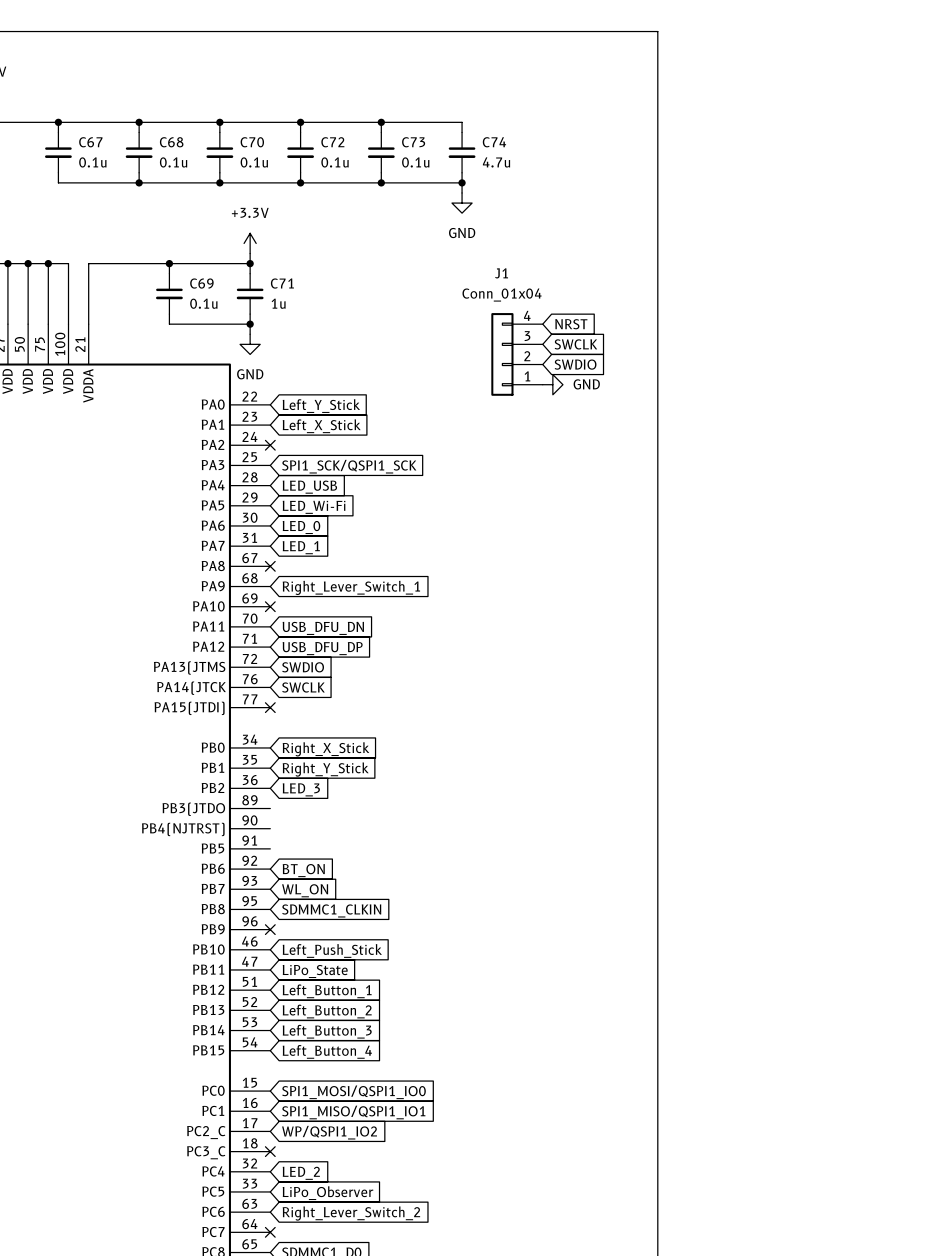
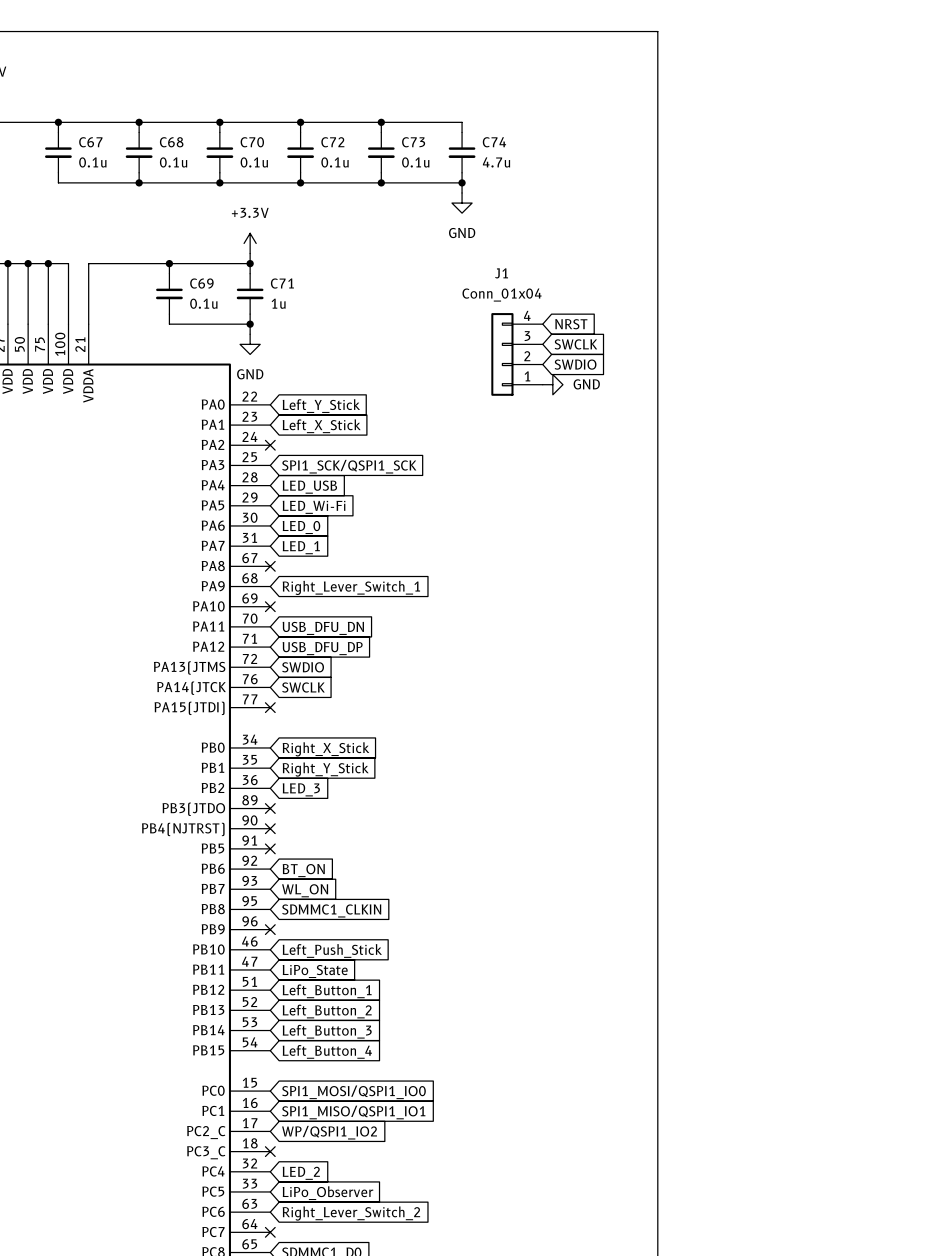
no-connect mark: none -> (270, 808)
no-connect mark: none -> (270, 828)
no-connect mark: none -> (270, 848)

